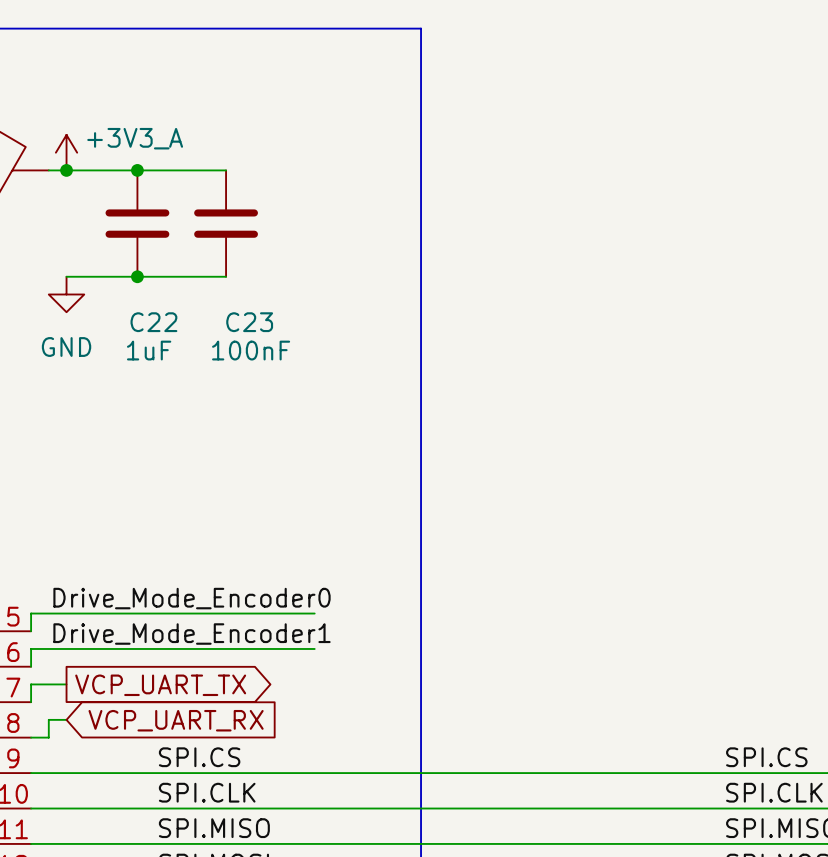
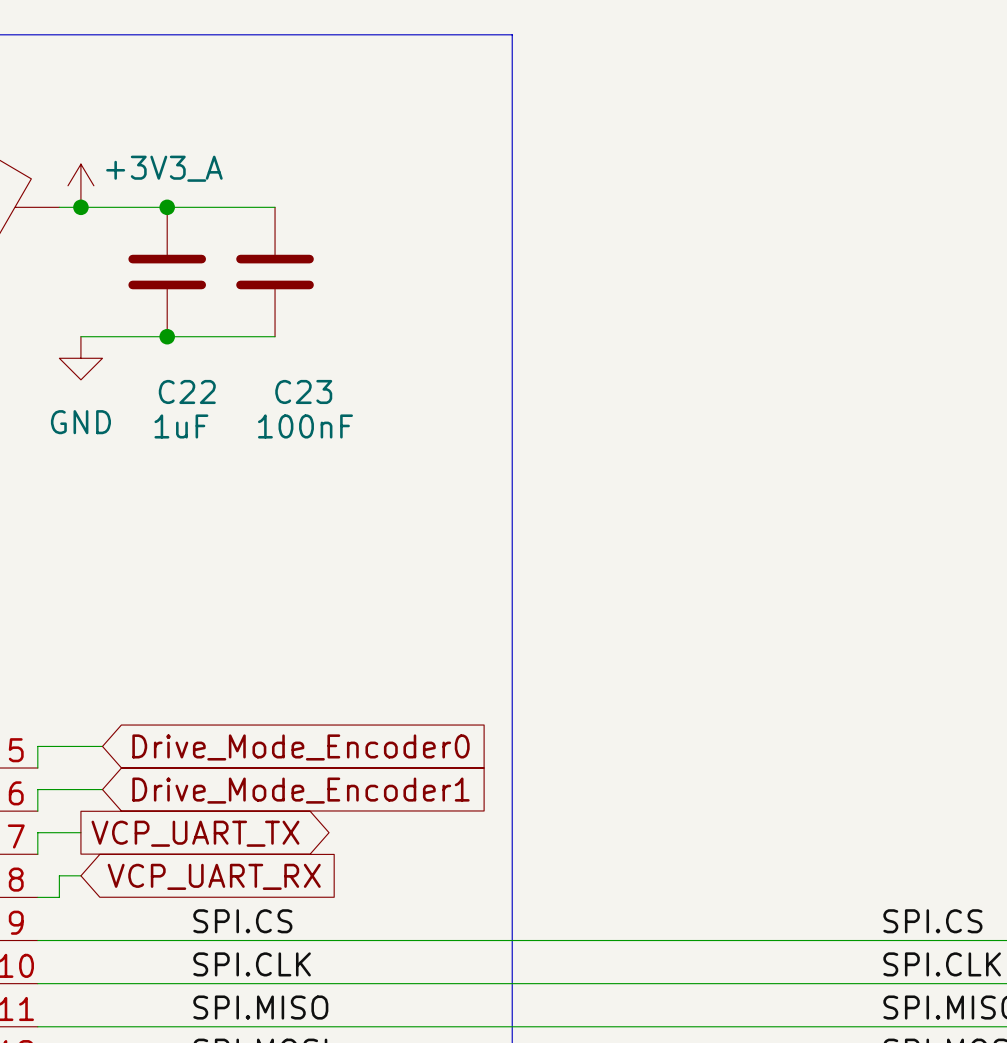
label: Drive_Mode_Encoder0 (192, 598) -> none
wire: (84, 613) (314, 613) -> none
global label: none -> Drive_Mode_Encoder0 (300, 747)
label: Drive_Mode_Encoder1 (192, 634) -> none
wire: (84, 648) (314, 648) -> none
global label: none -> Drive_Mode_Encoder1 (300, 790)

